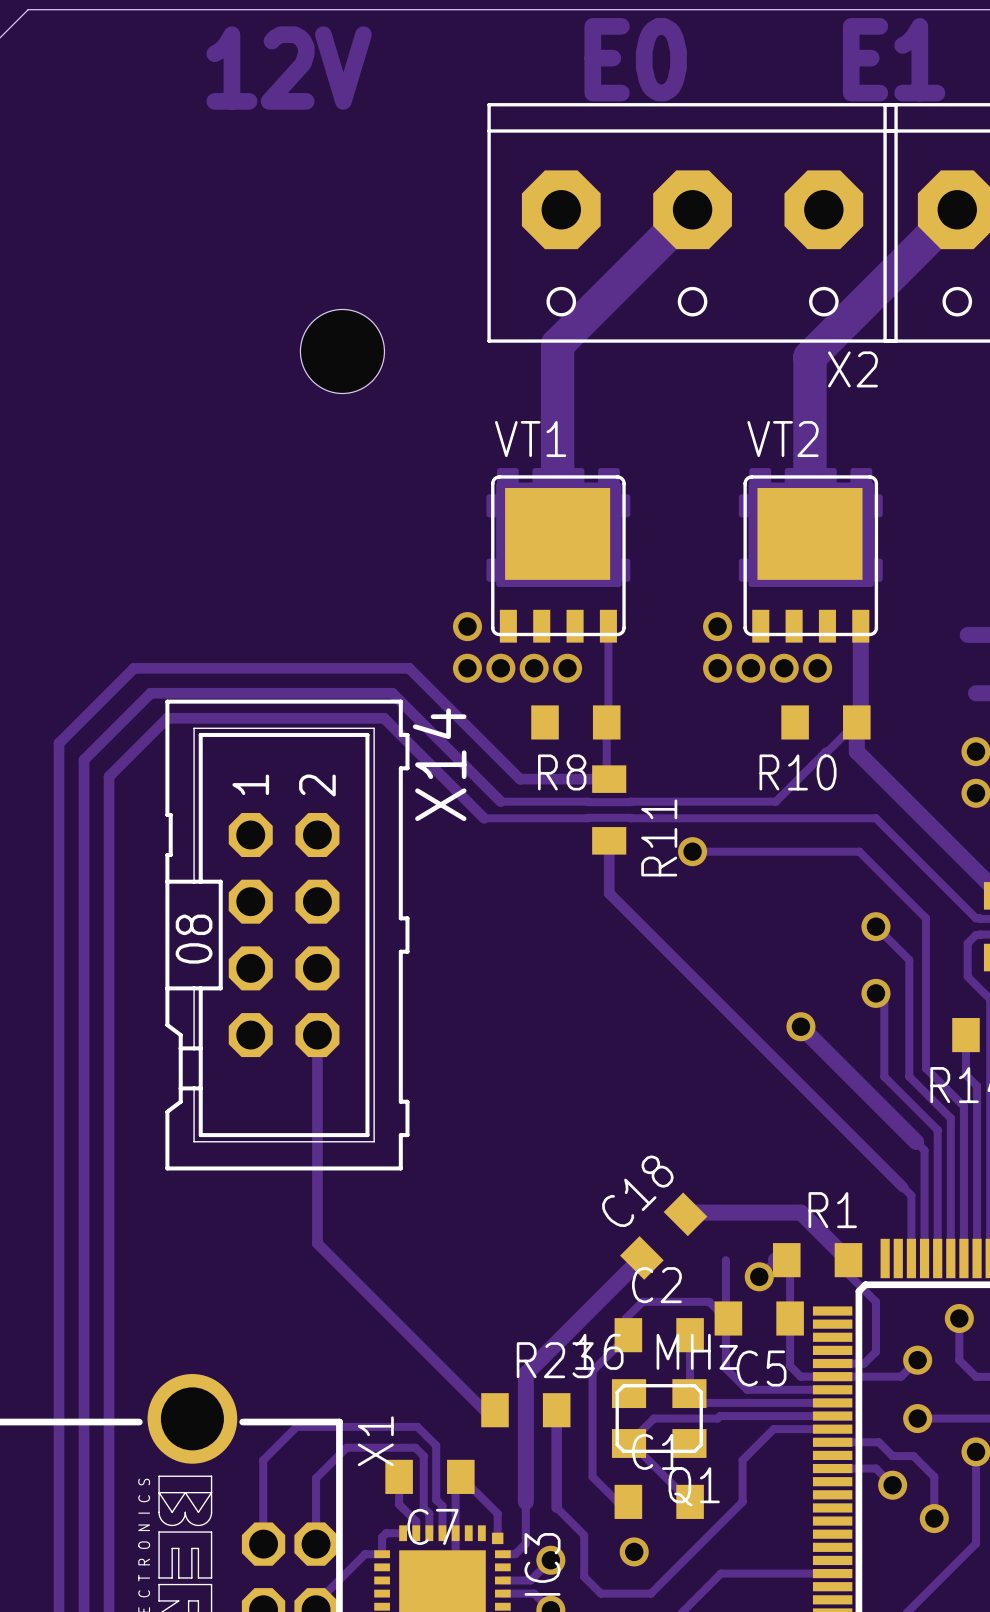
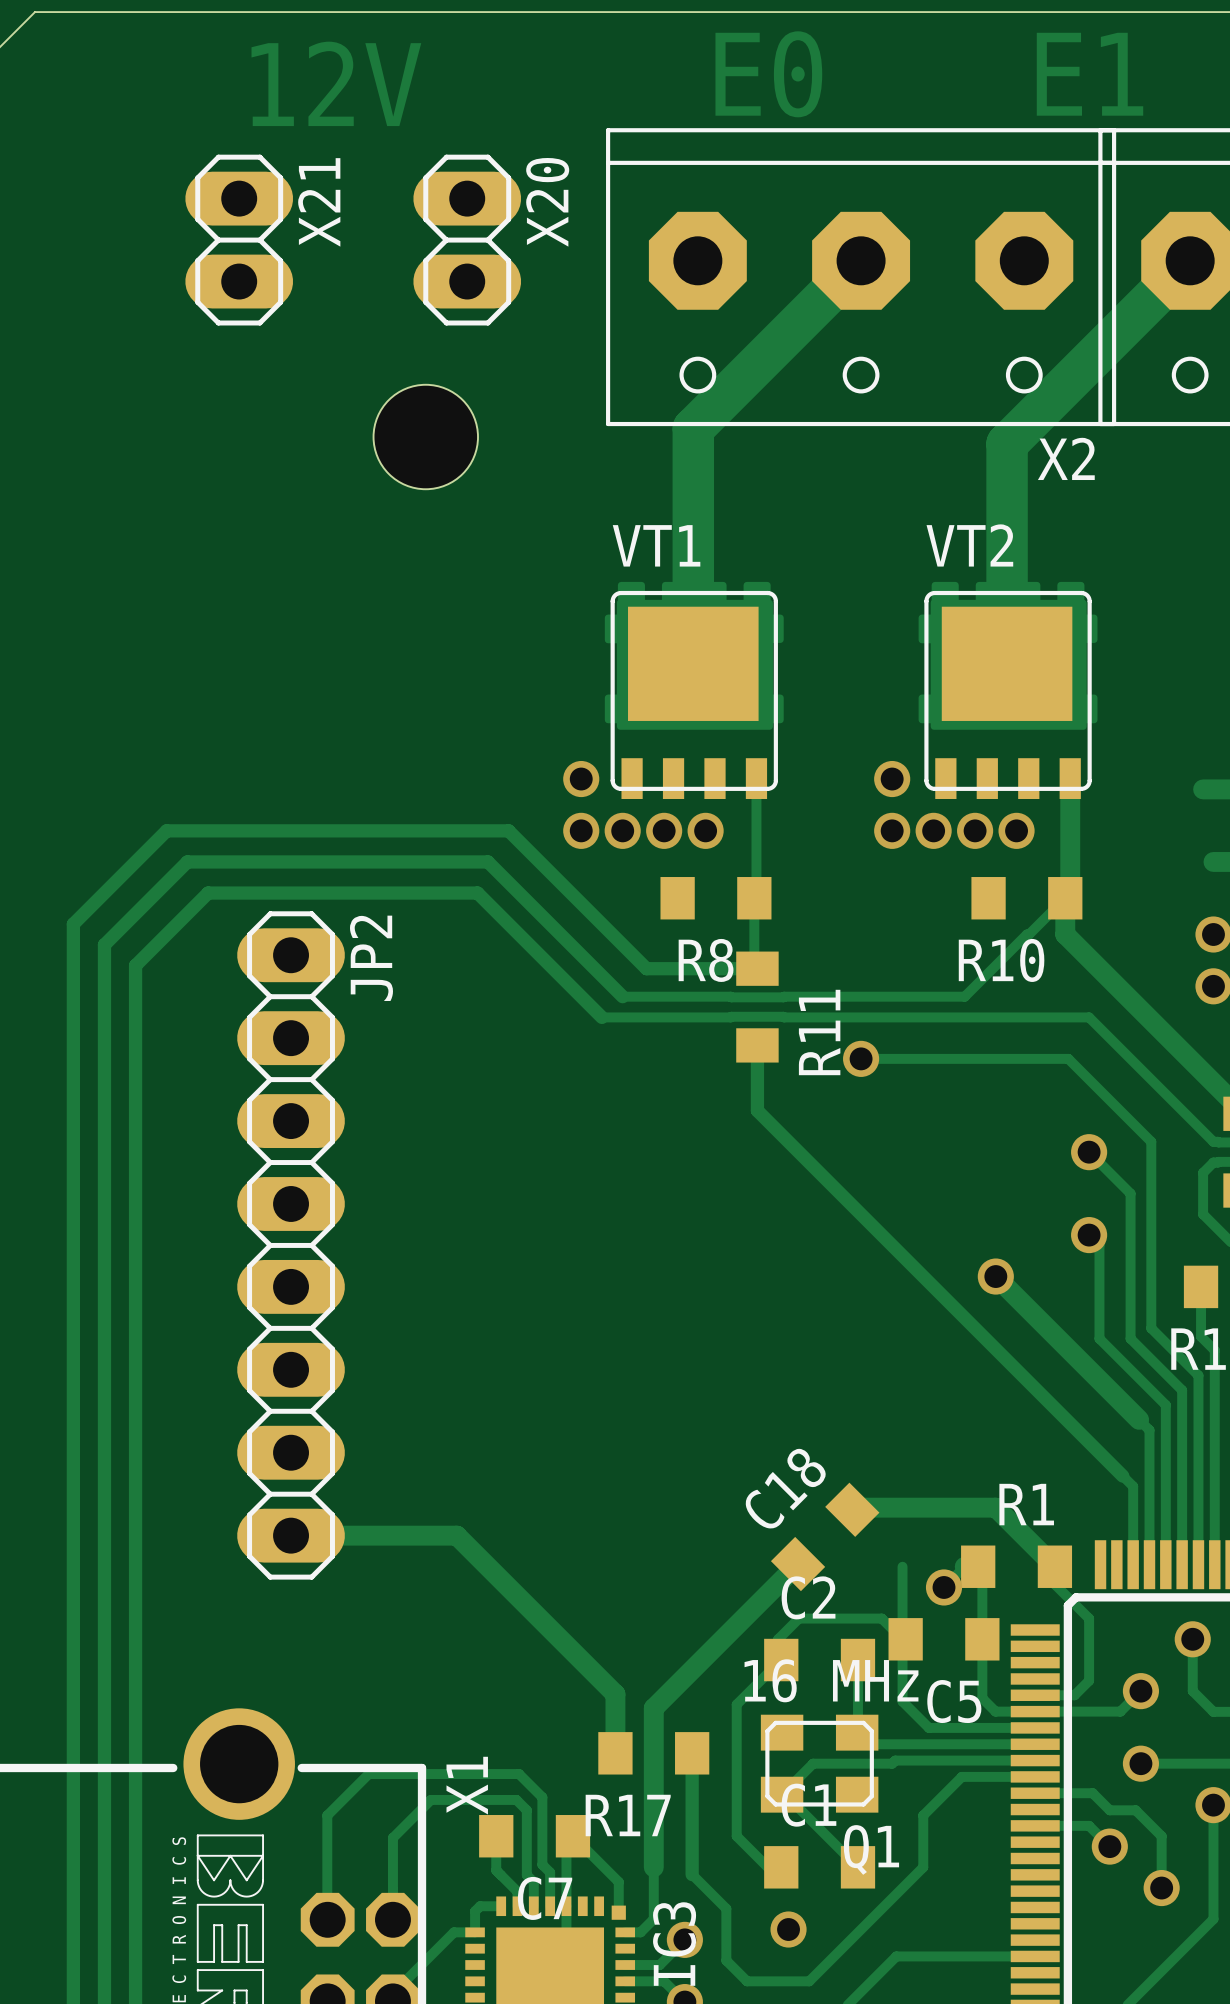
X21: none -> (239, 240)
X20: none -> (467, 240)
X14: (287, 935) -> none
JP2: none -> (291, 1245)
track: (317, 1035) (317, 1243) (484, 1410) (495, 1410) -> (291, 1535) (456, 1535) (615, 1694) (615, 1753)
R23 name: R23 (555, 1360) -> R17 (628, 1815)

